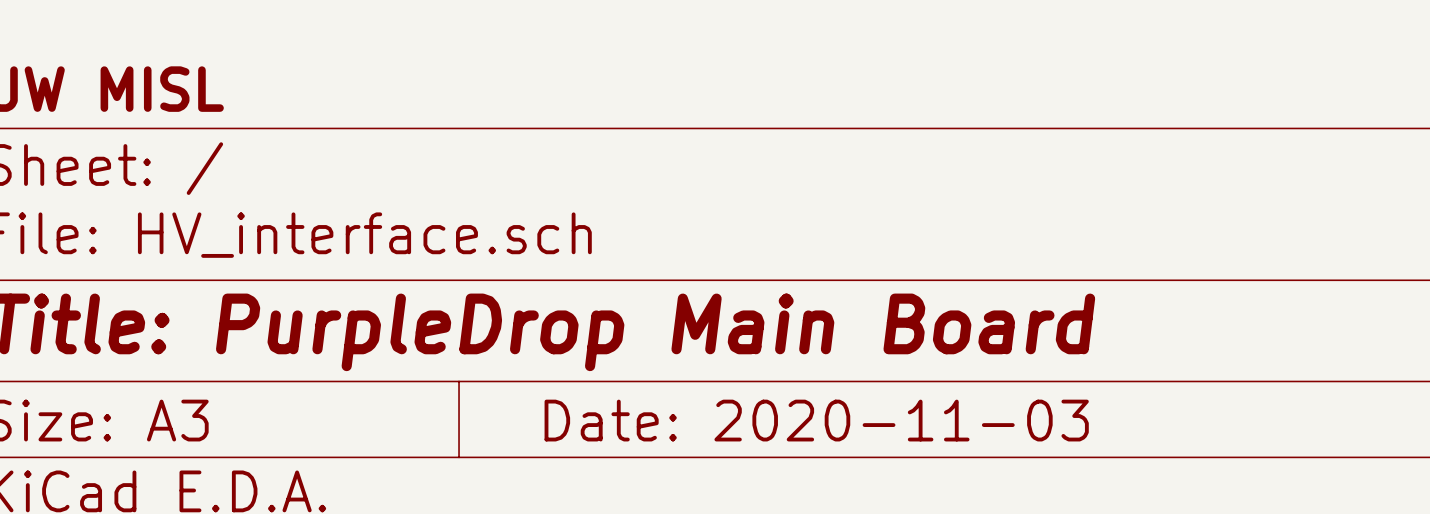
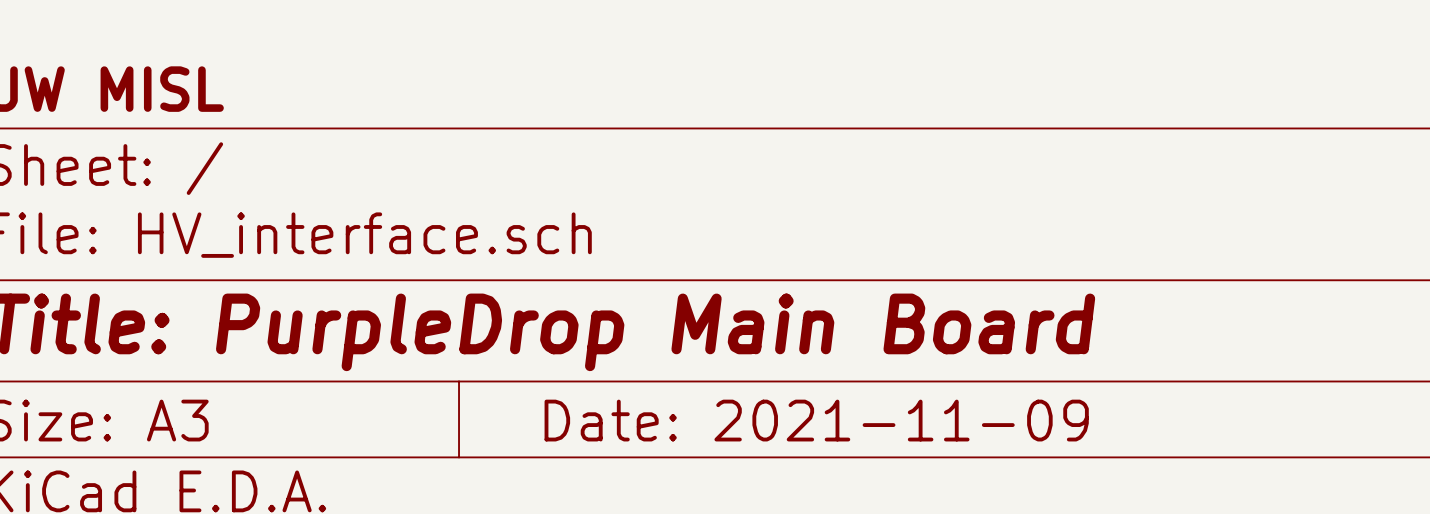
title block: Date: 2020-11-03 (816, 420) -> Date: 2021-11-09 (816, 420)

